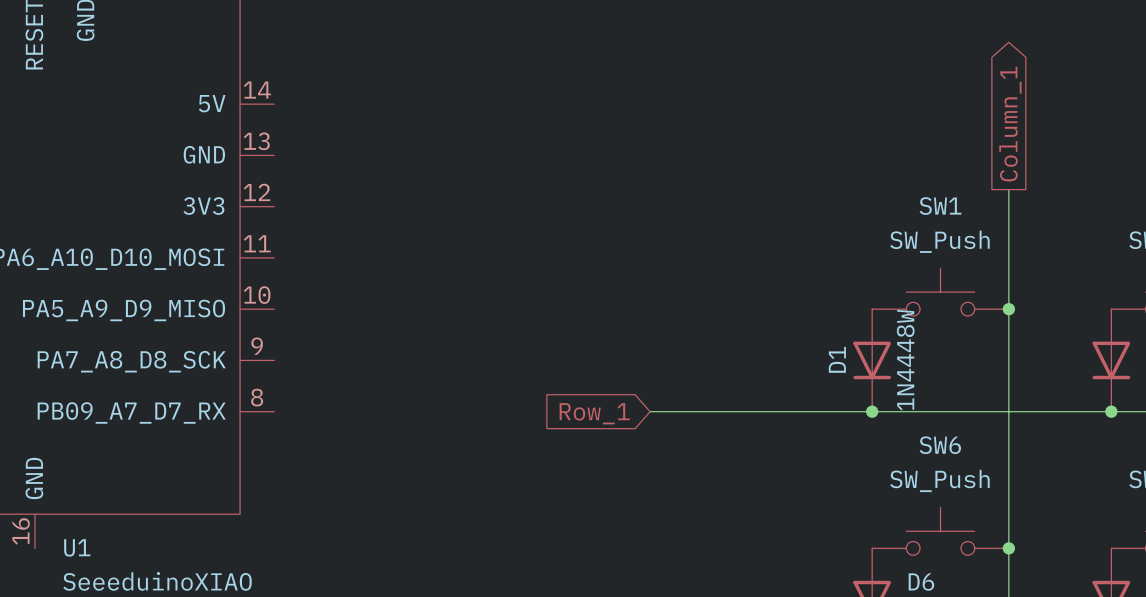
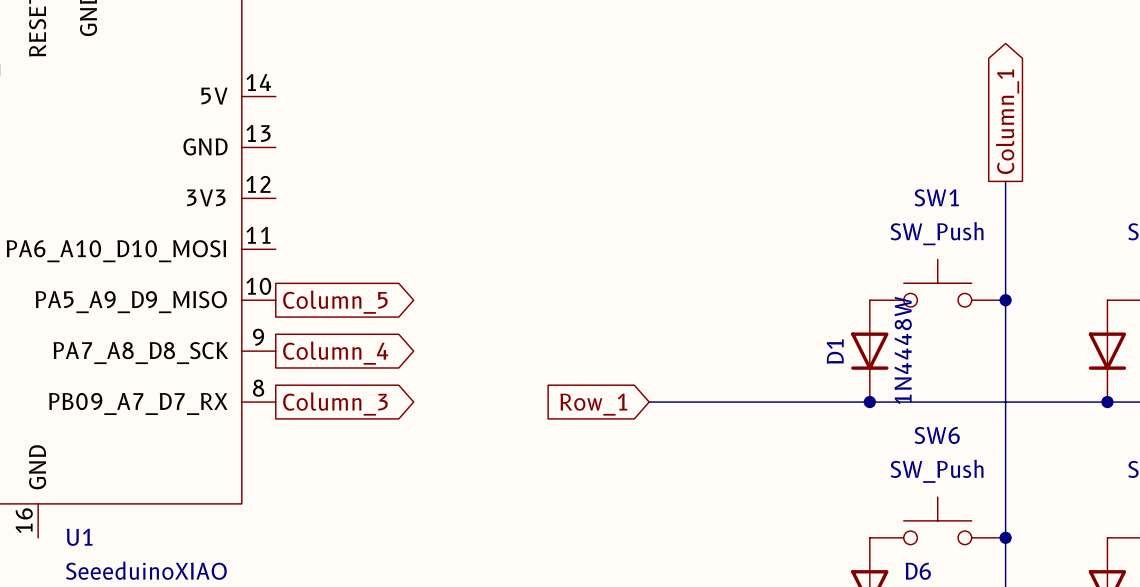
global label: none -> Column_5 (335, 302)
global label: none -> Column_4 (335, 353)
global label: none -> Column_3 (335, 404)

